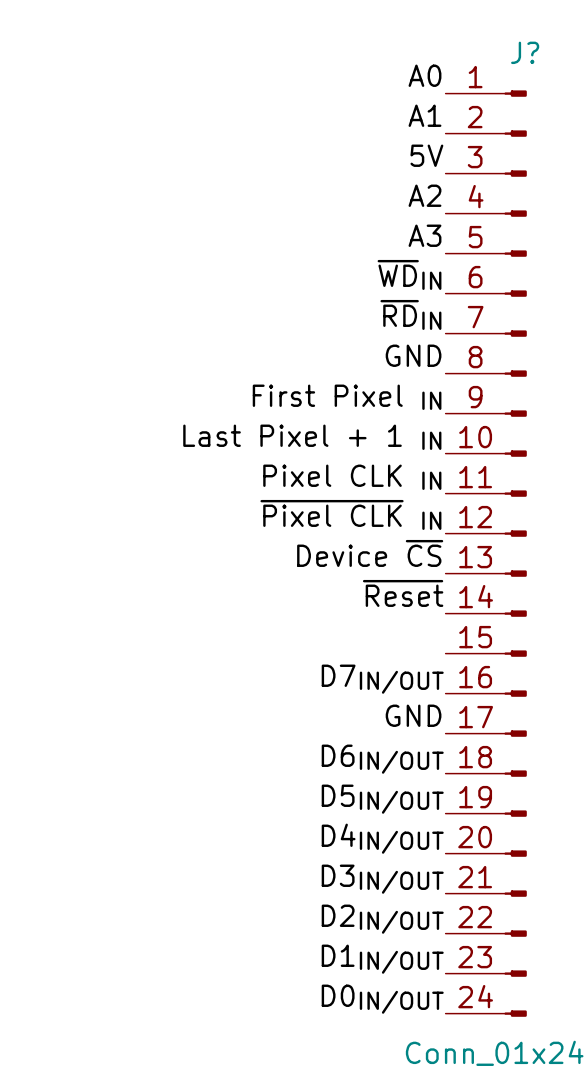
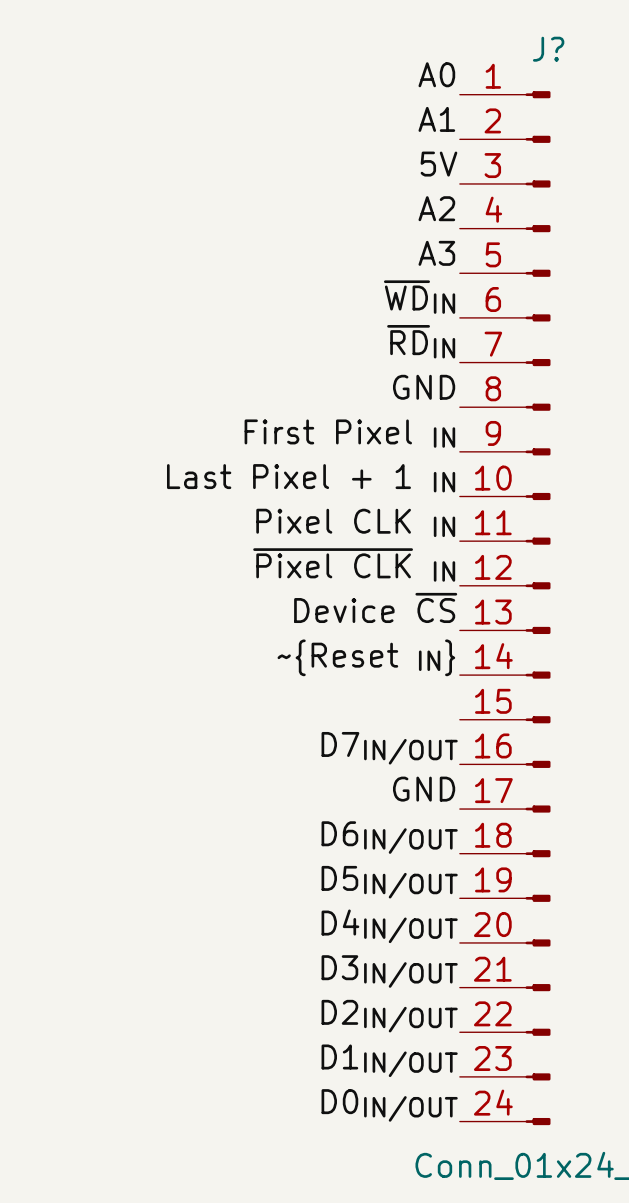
label: ~{Reset} (403, 593) -> ~{Reset IN} (366, 657)

